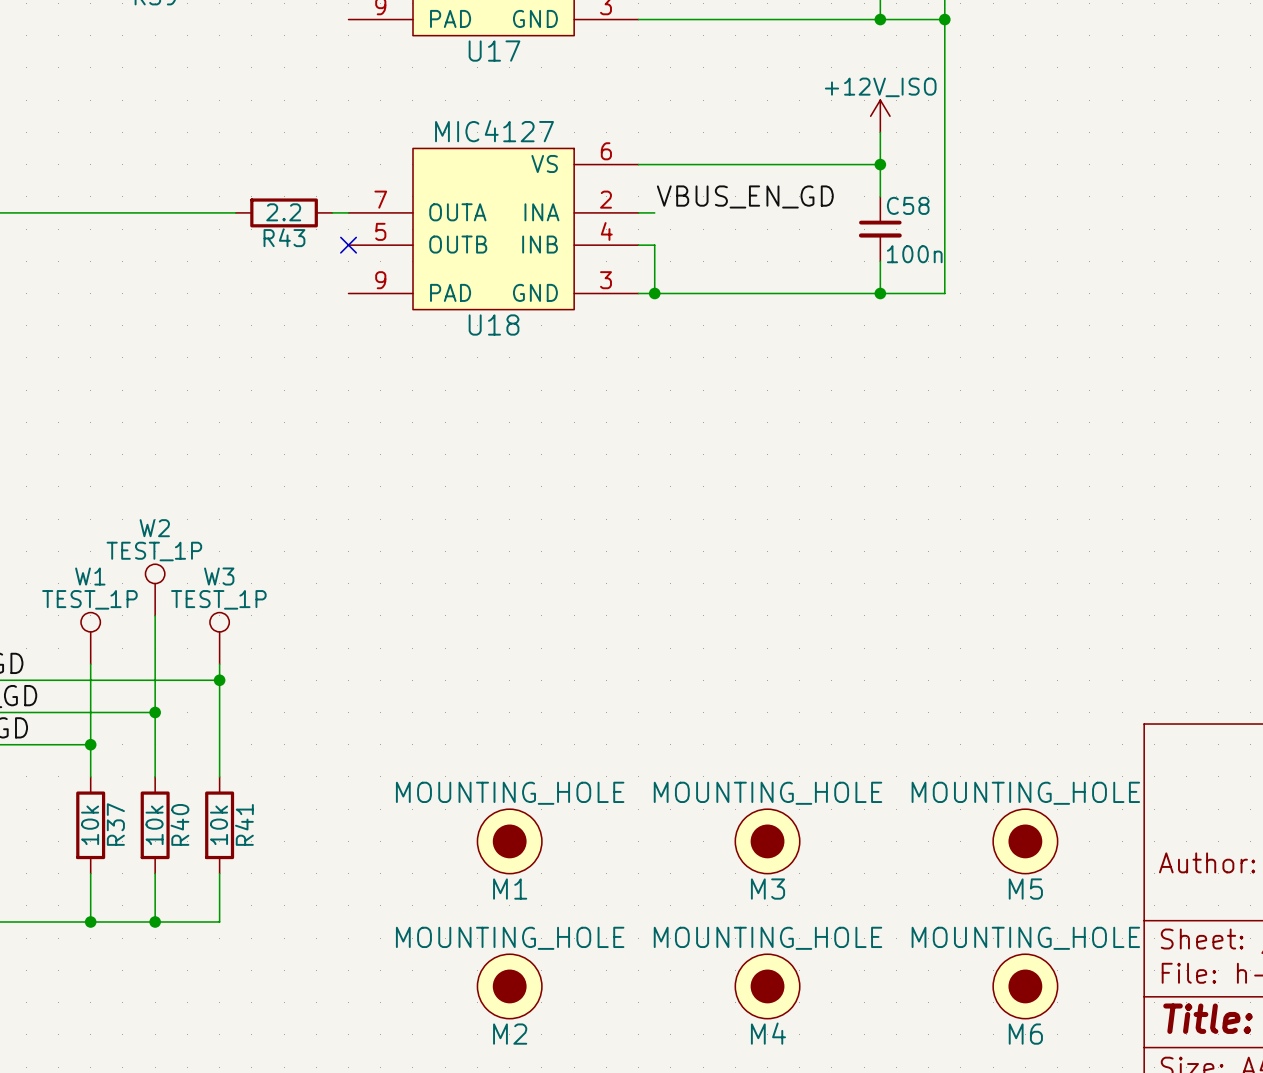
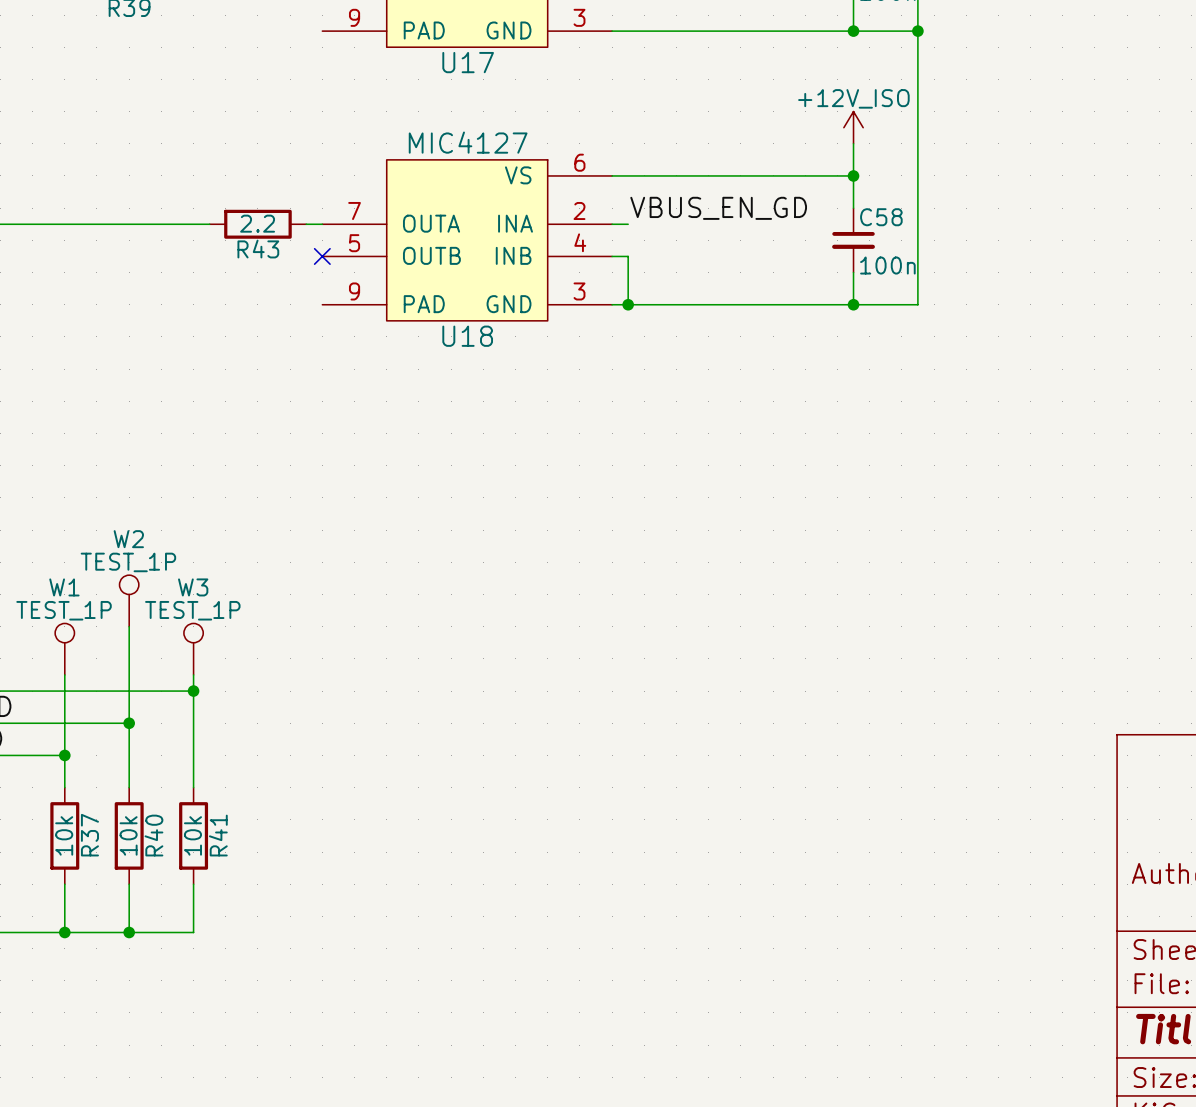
M1: MOUNTING_HOLE (509, 841) -> none
M3: MOUNTING_HOLE (767, 841) -> none
M5: MOUNTING_HOLE (1025, 841) -> none
M2: MOUNTING_HOLE (509, 986) -> none
M4: MOUNTING_HOLE (767, 986) -> none
M6: MOUNTING_HOLE (1025, 986) -> none

